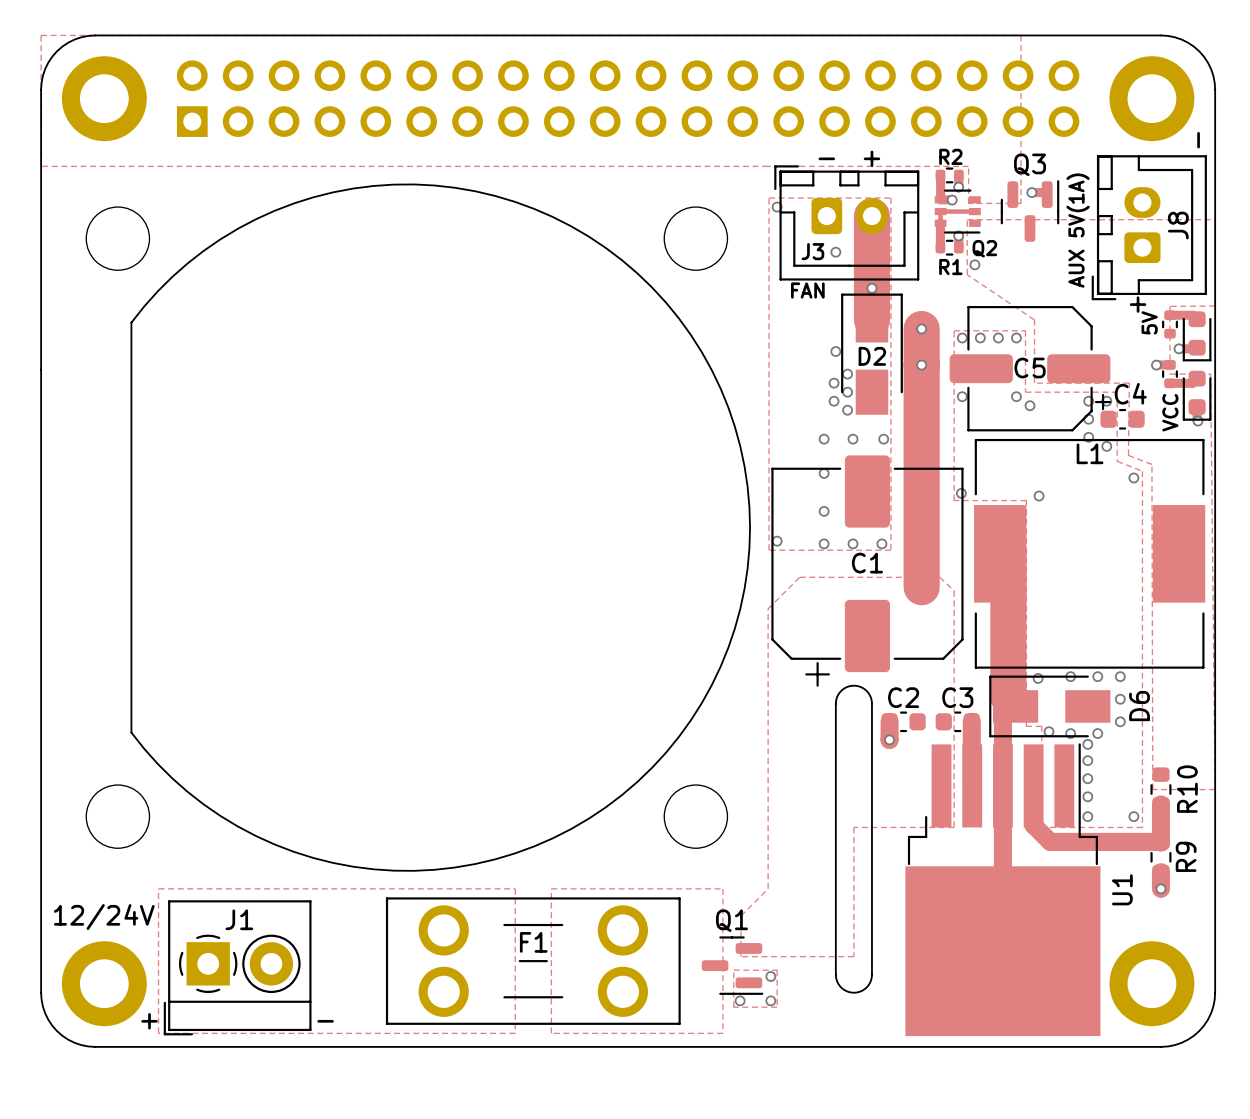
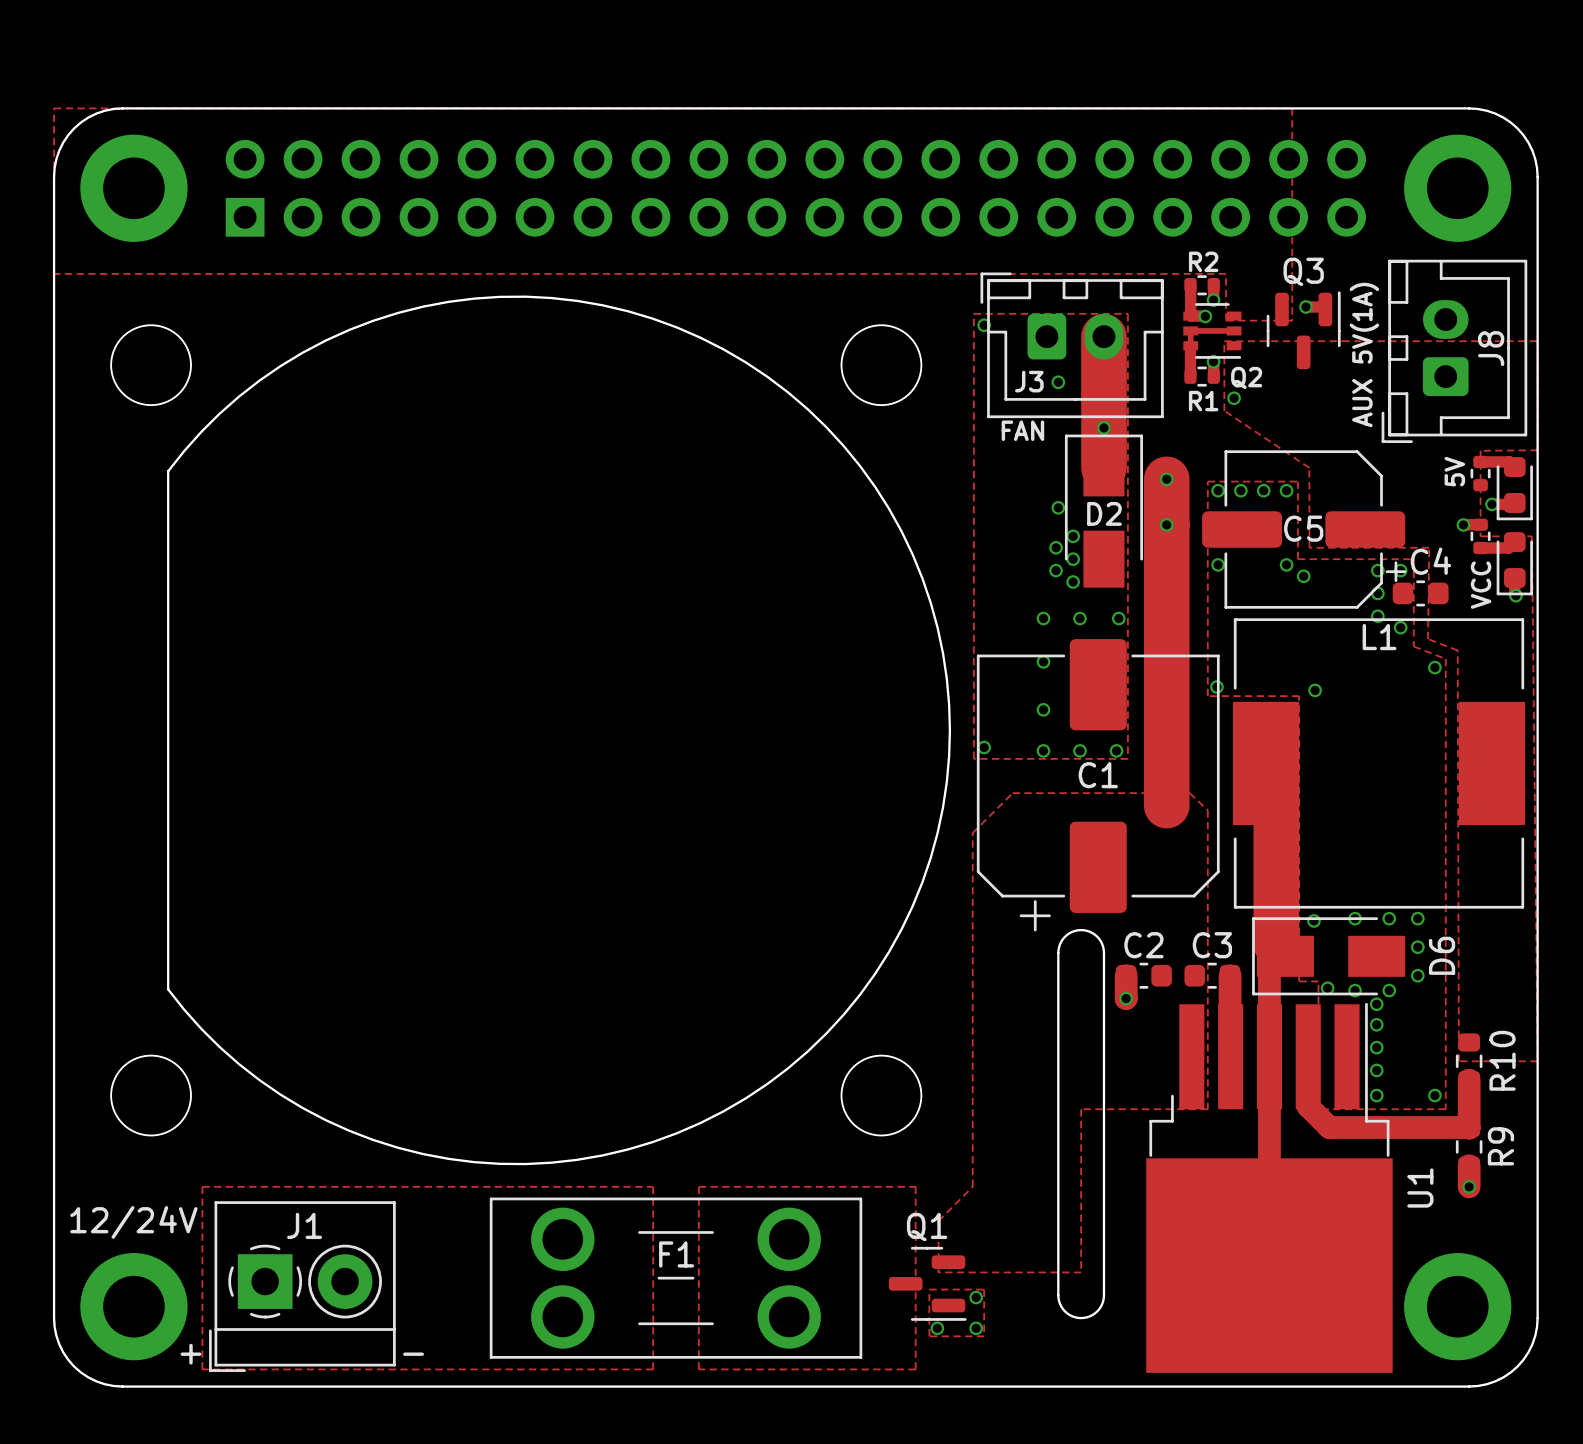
text: - (1198, 140) -> none
text: - (826, 158) -> none
text: + (871, 158) -> none
text: + (1138, 304) -> none

